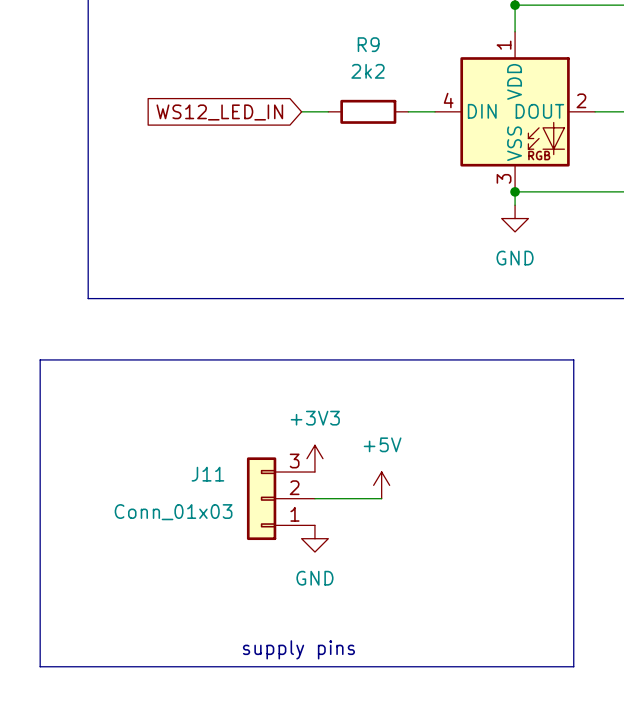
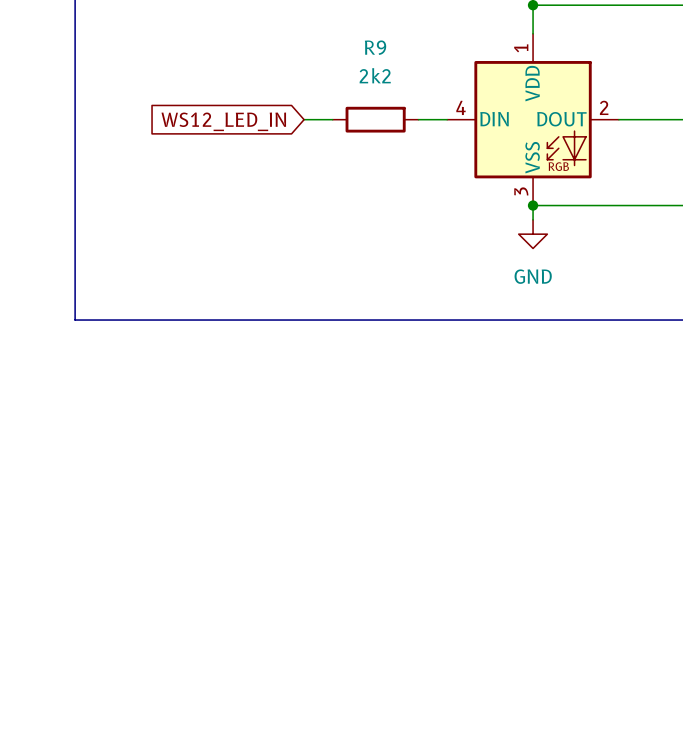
line: (40, 359) (573, 359) (573, 666) (40, 666) (40, 359) -> none
power symbol: +3V3 (314, 458) -> none
power symbol: +5V (381, 485) -> none
J11: Conn_01x03 (280, 498) -> none
wire: (314, 498) (381, 498) -> none
power symbol: GND (314, 538) -> none
text: supply pins (298, 649) -> none

